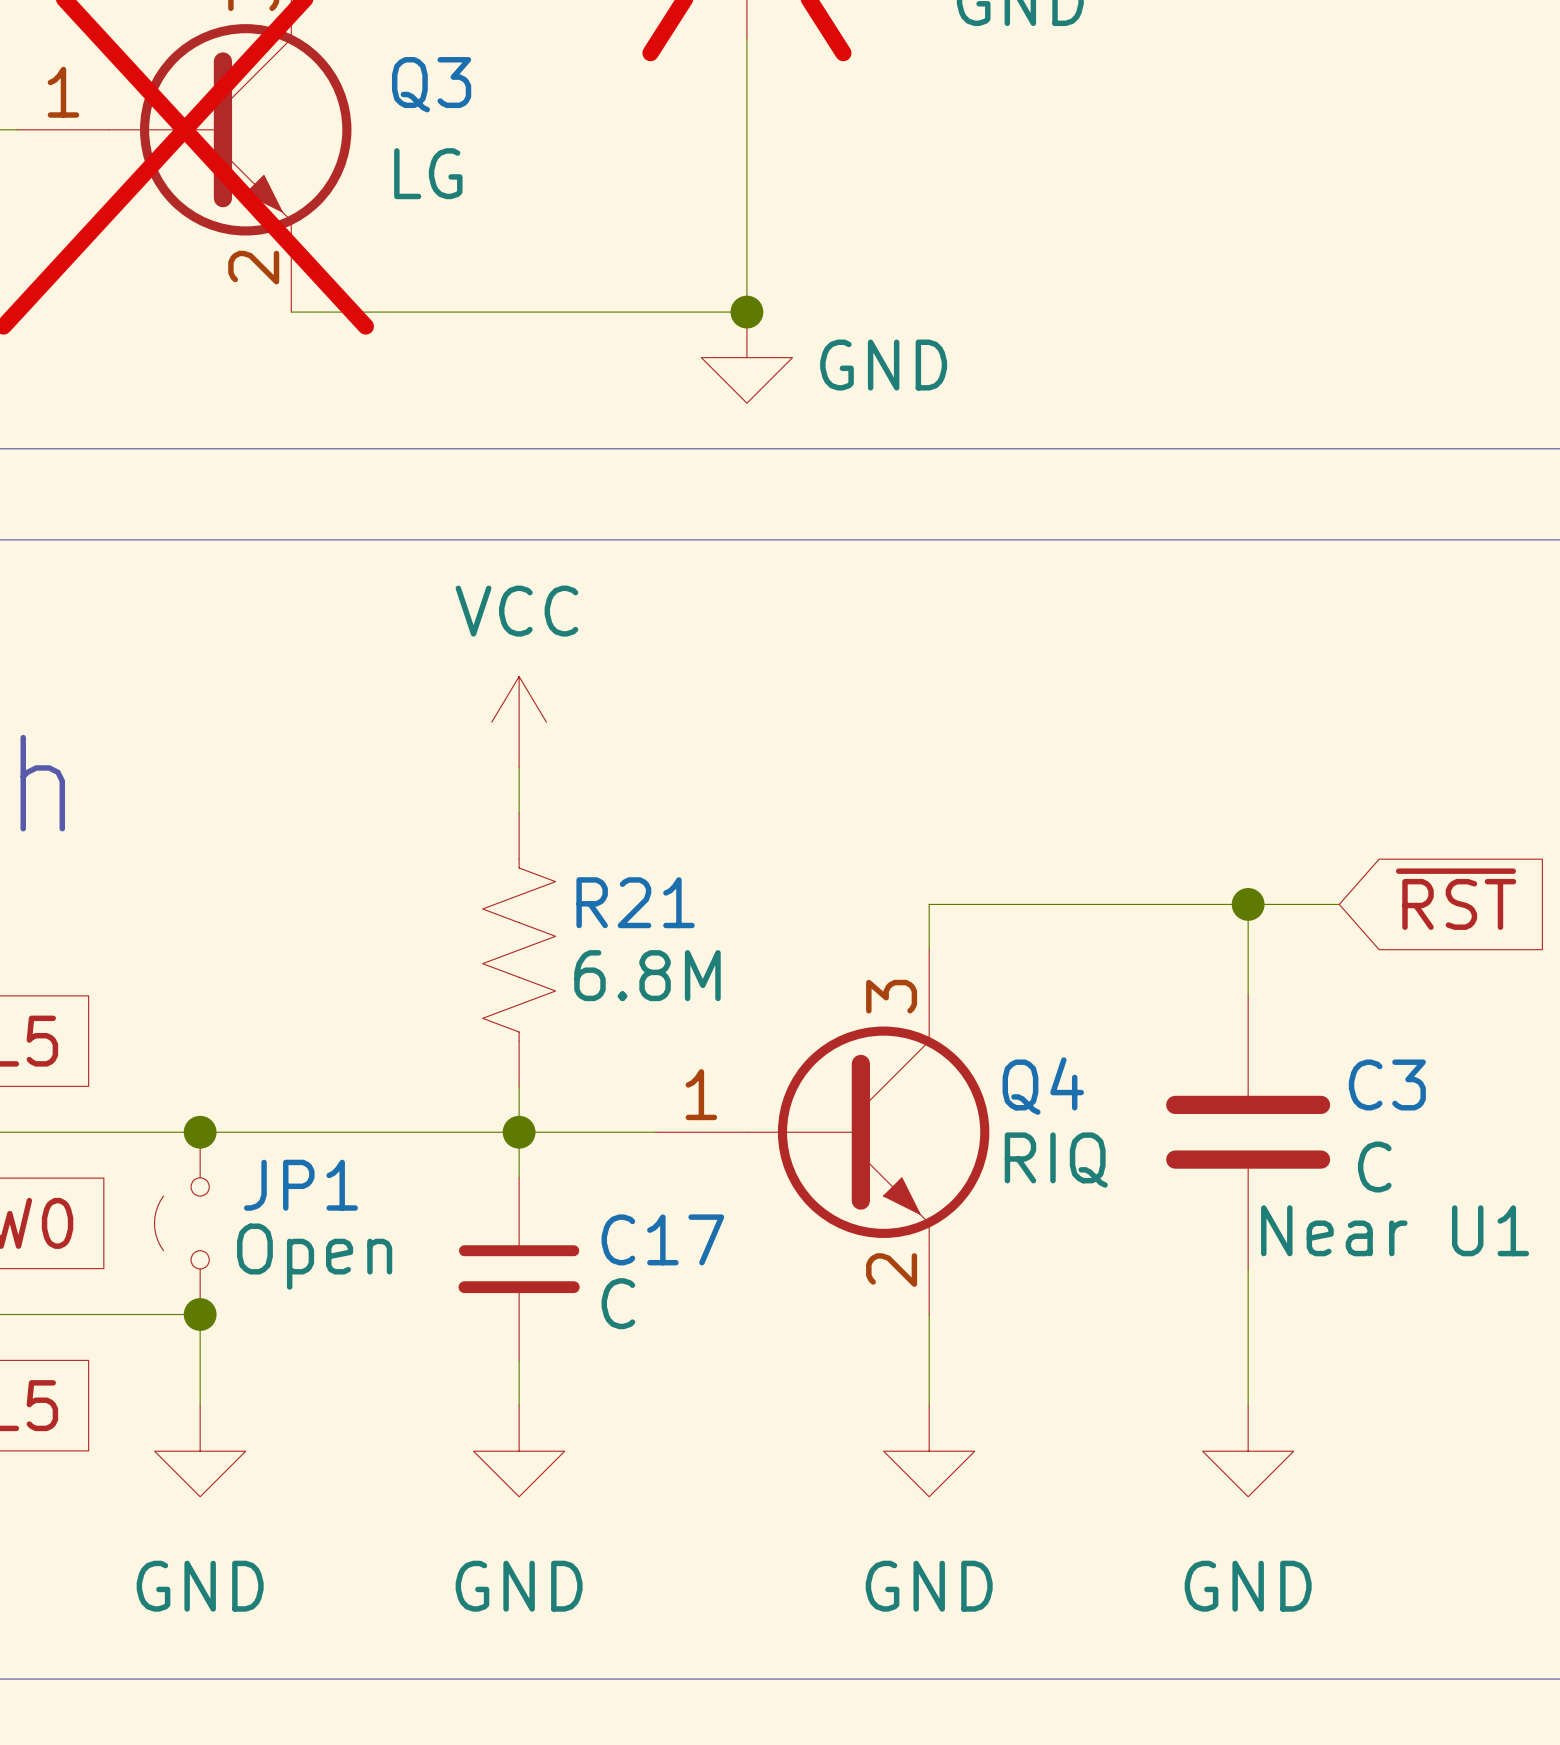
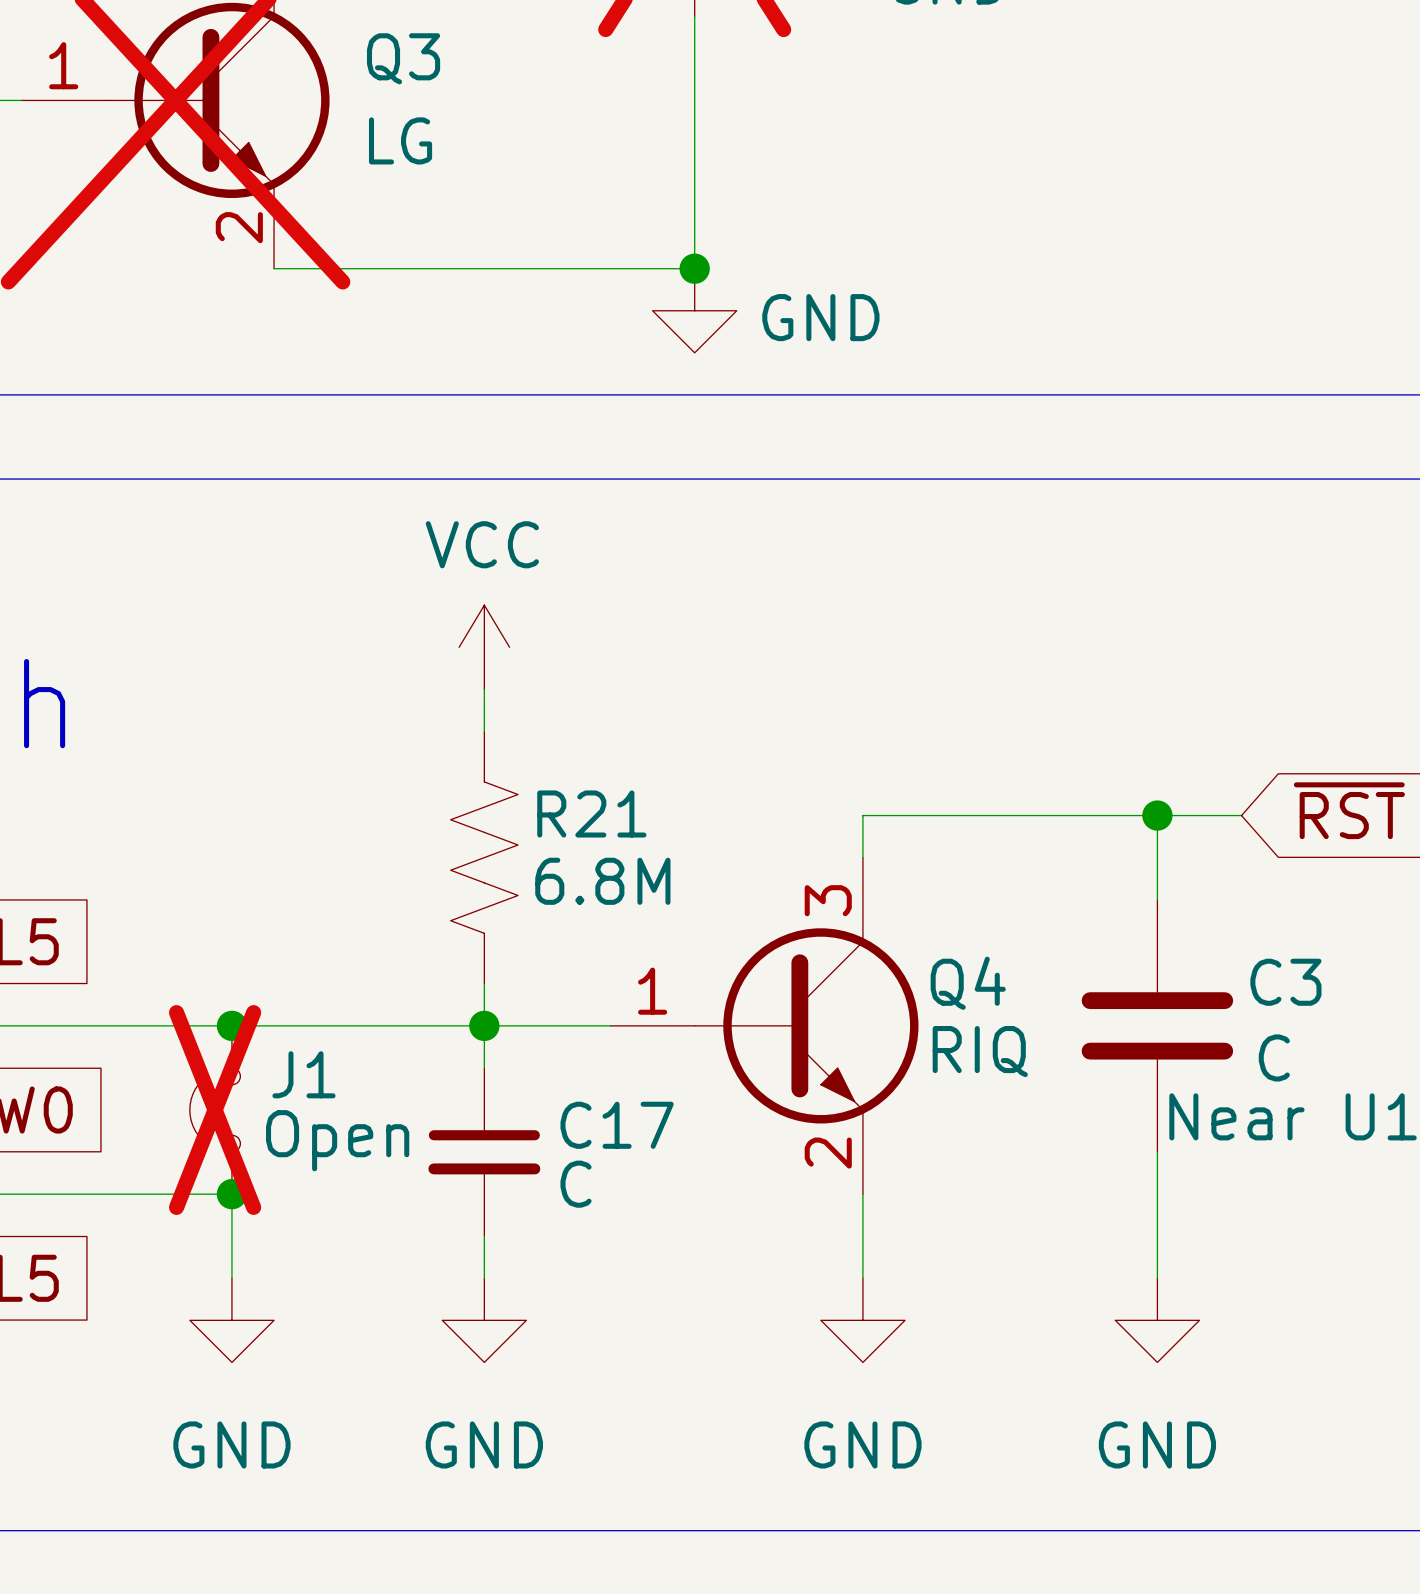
junction position: (200, 1132) -> (231, 1025)
JP1: Open (181, 1223) -> none
J1: none -> Open (215, 1110)
wire: (200, 1314) (200, 1405) -> (189, 1194) (231, 1194) (231, 1278)
junction position: (200, 1314) -> (231, 1194)
power symbol position: GND (200, 1451) -> GND (231, 1320)

